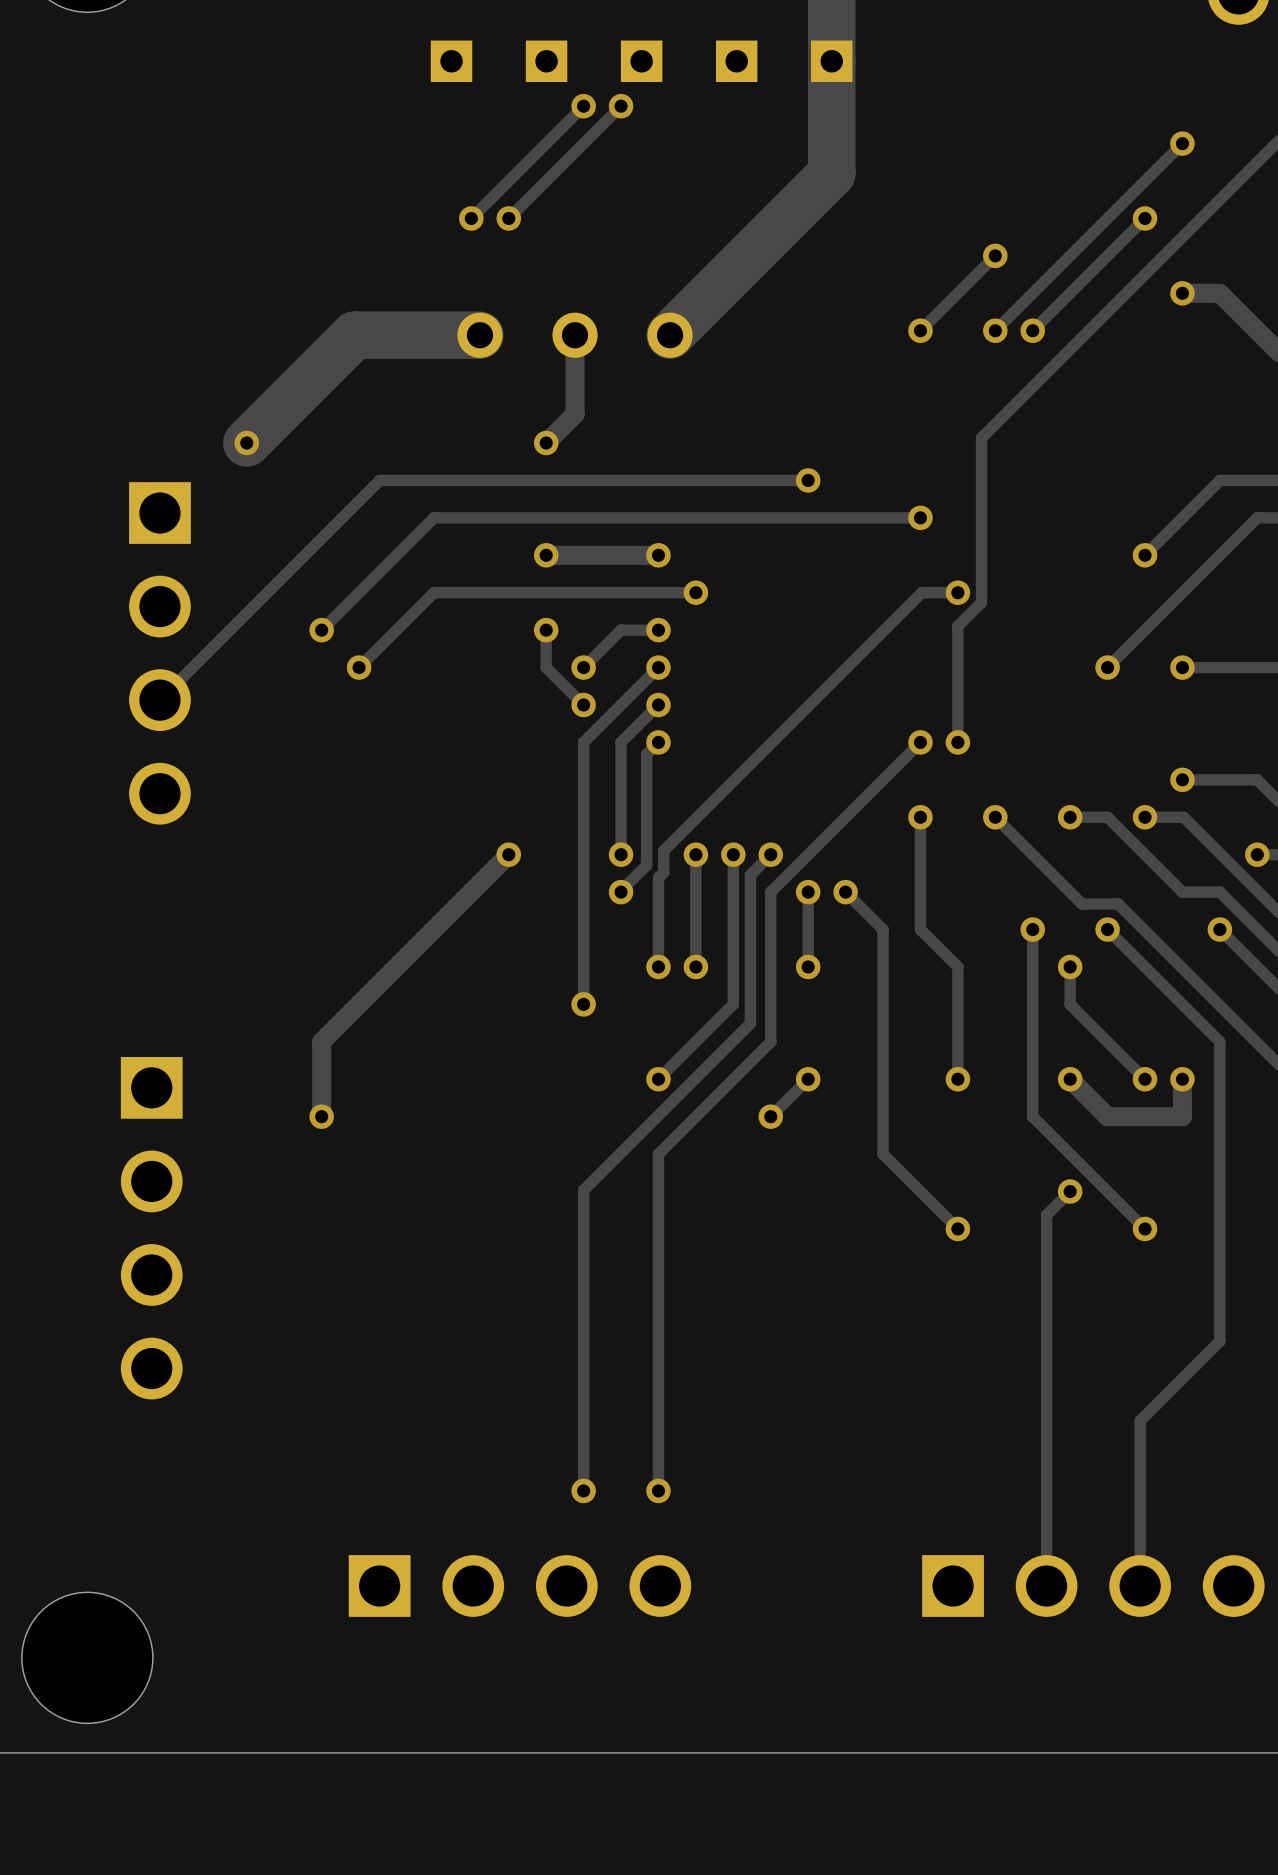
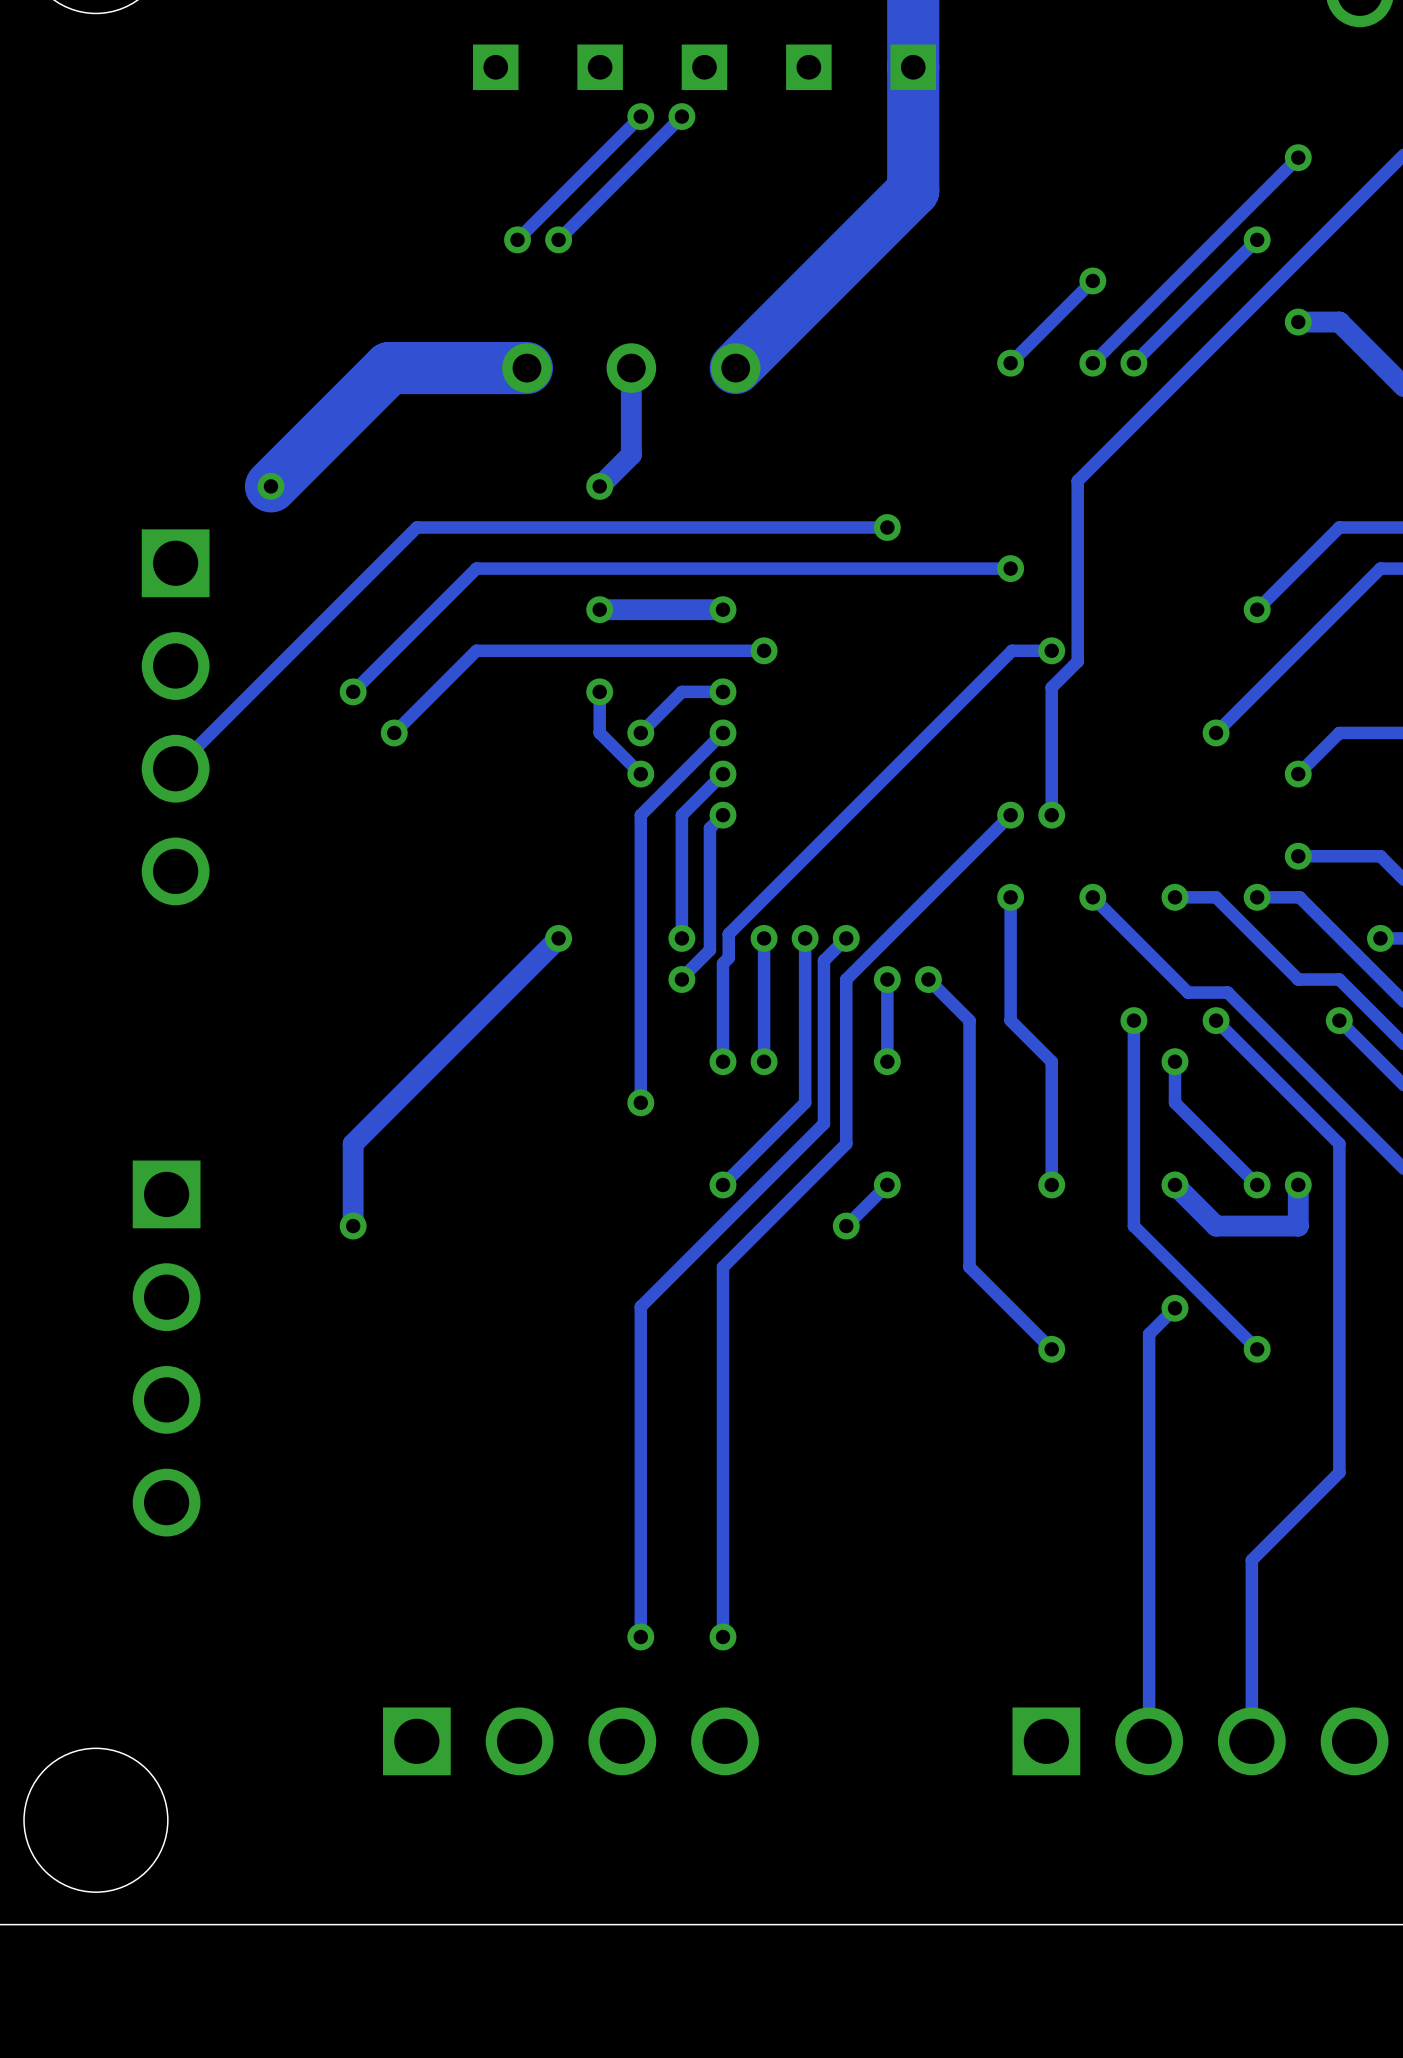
via position: (1182, 667) -> (1298, 774)
track: (1219, 667) (1182, 667) -> (1339, 732) (1298, 774)

